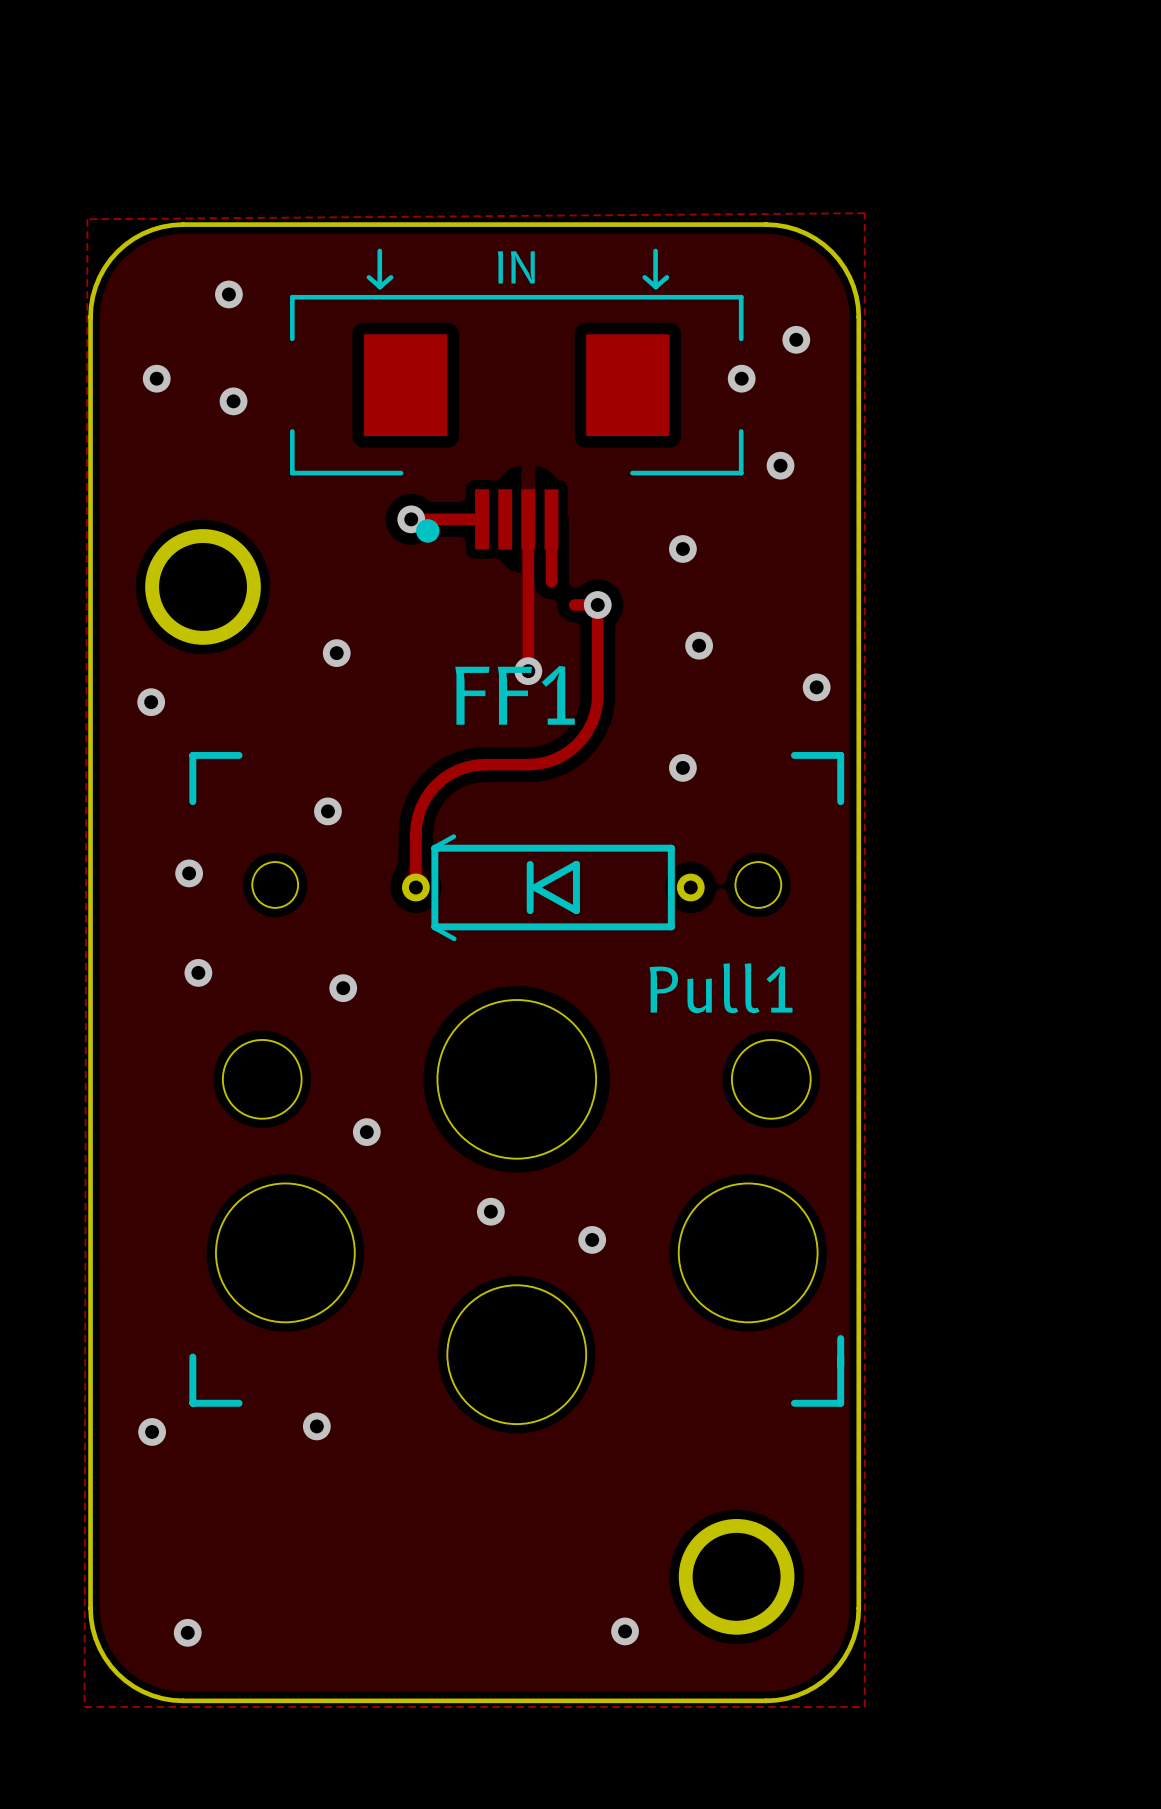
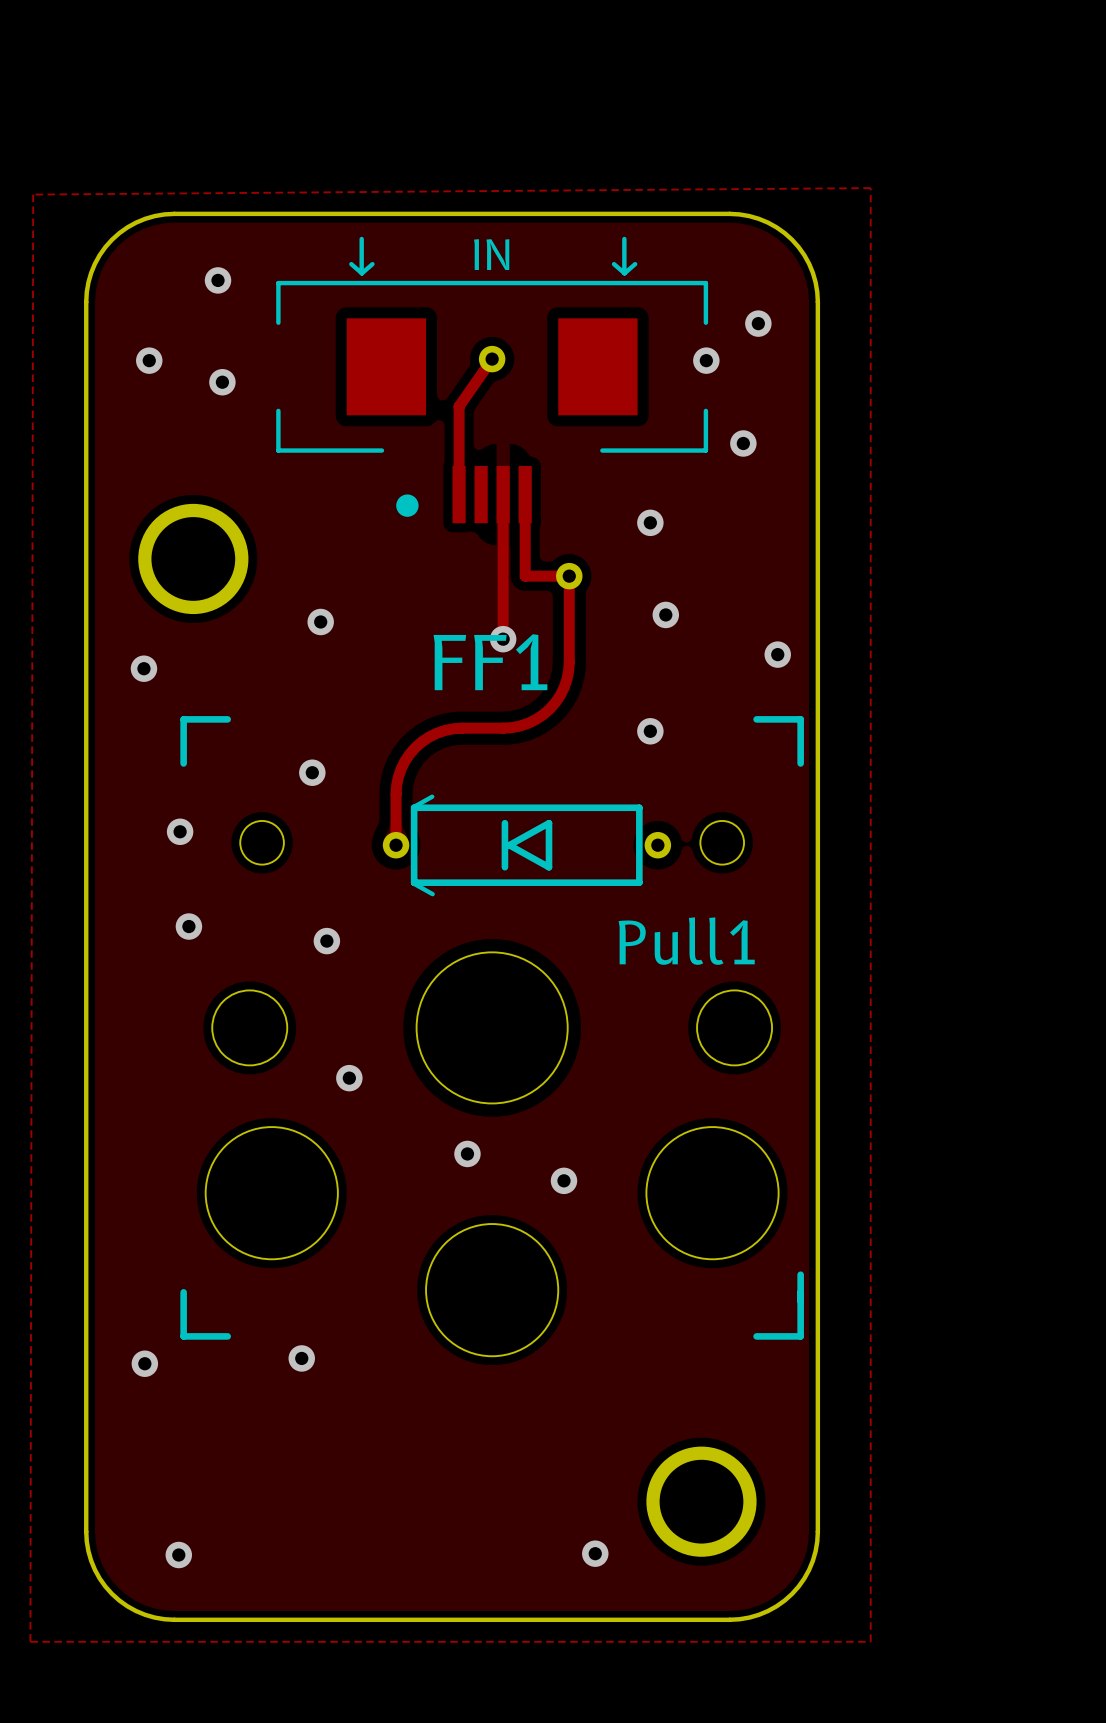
zone outline: (864, 213) (864, 1706) (84, 1706) (87, 219) (864, 213) -> (870, 188) (33, 194) (30, 1641) (870, 1641) (870, 188)
FF1 footprint: [290, 248, 744, 550] -> [276, 236, 709, 590]
track: (411, 519) (482, 519) -> none
via: (411, 519) -> none
track: (551, 519) (551, 581) -> none
track: (574, 604) (597, 604) -> none
via: (597, 604) -> none

